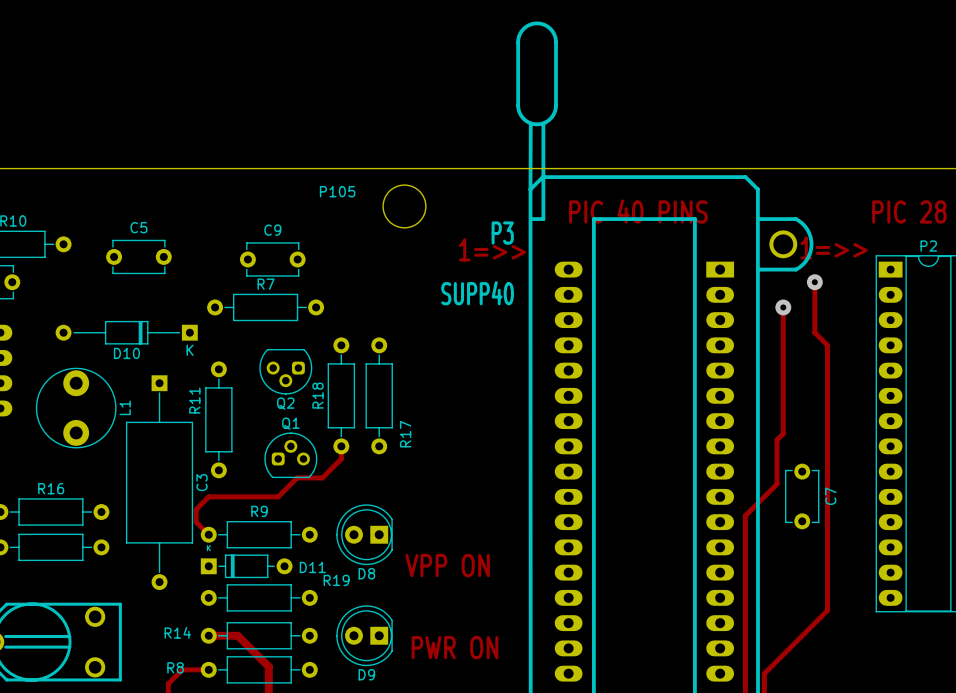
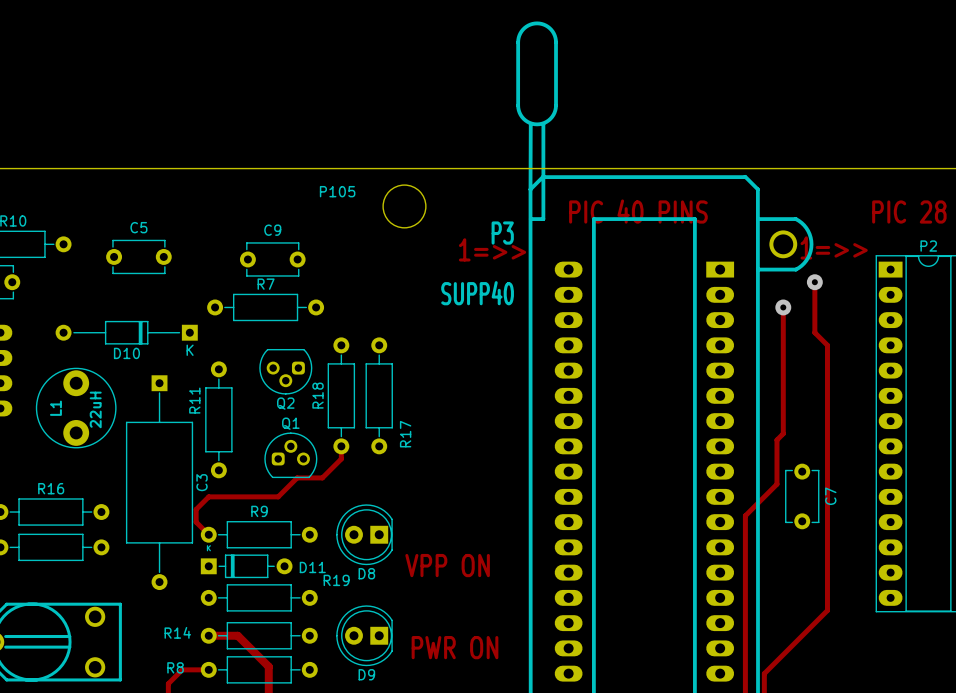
L1 name position: L1 (125, 407) -> L1 (55, 408)
L1 value: none -> 22uH (95, 409)

